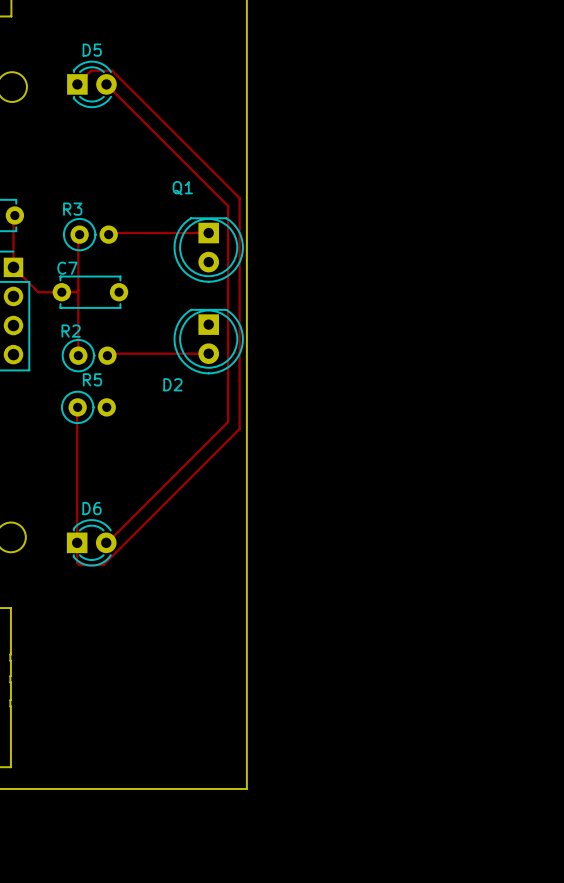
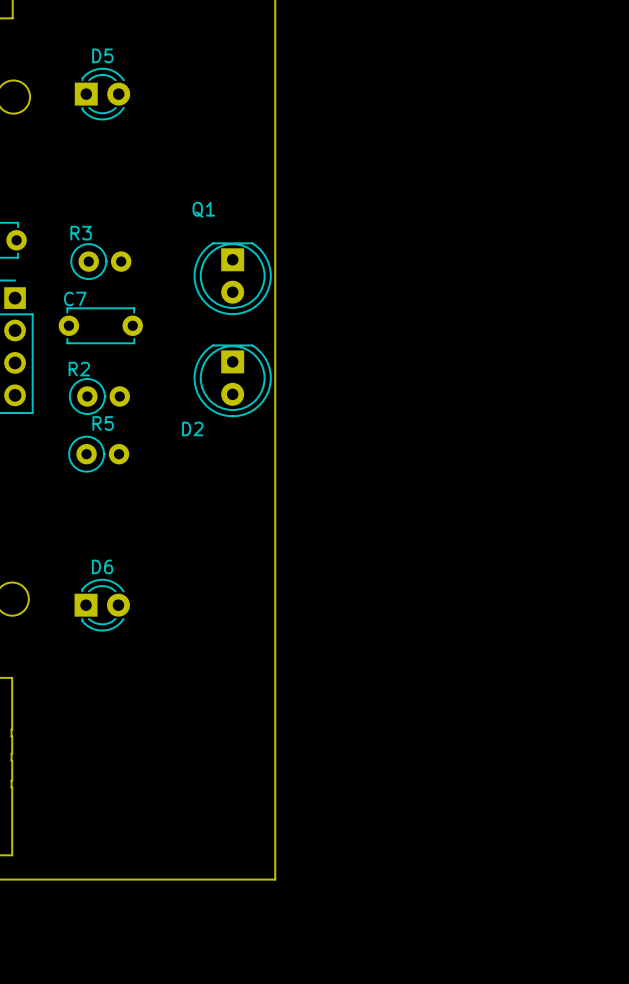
track: (77, 84) (91, 70) (112, 70) (239, 198) (239, 428) (103, 565) (79, 565) (77, 562) (77, 407) -> none
track: (106, 84) (228, 206) (228, 421) (106, 542) -> none
track: (14, 215) (13, 267) (38, 292) (76, 292) (78, 290) -> none
track: (208, 233) (110, 233) (108, 234) -> none
track: (79, 234) (78, 355) -> none
track: (208, 353) (109, 353) (107, 355) -> none

